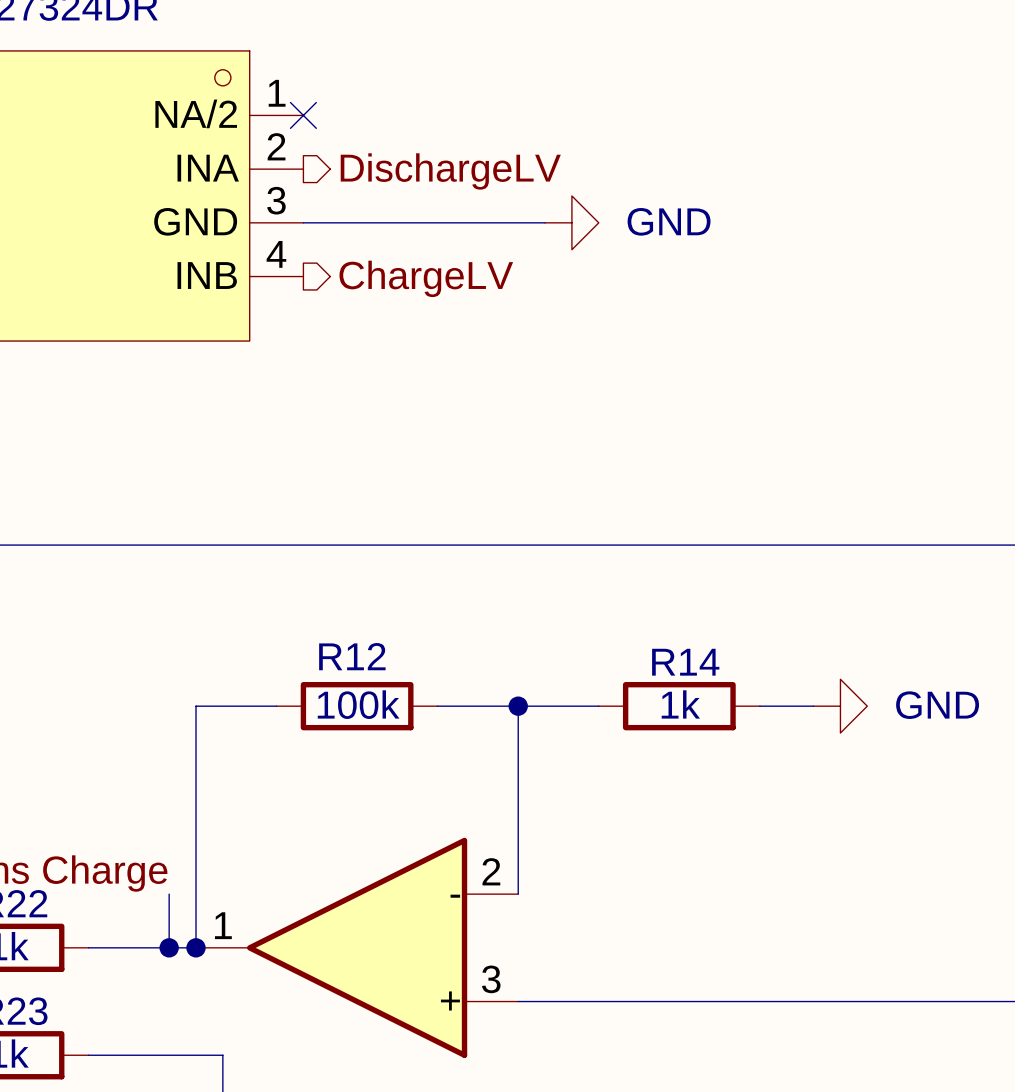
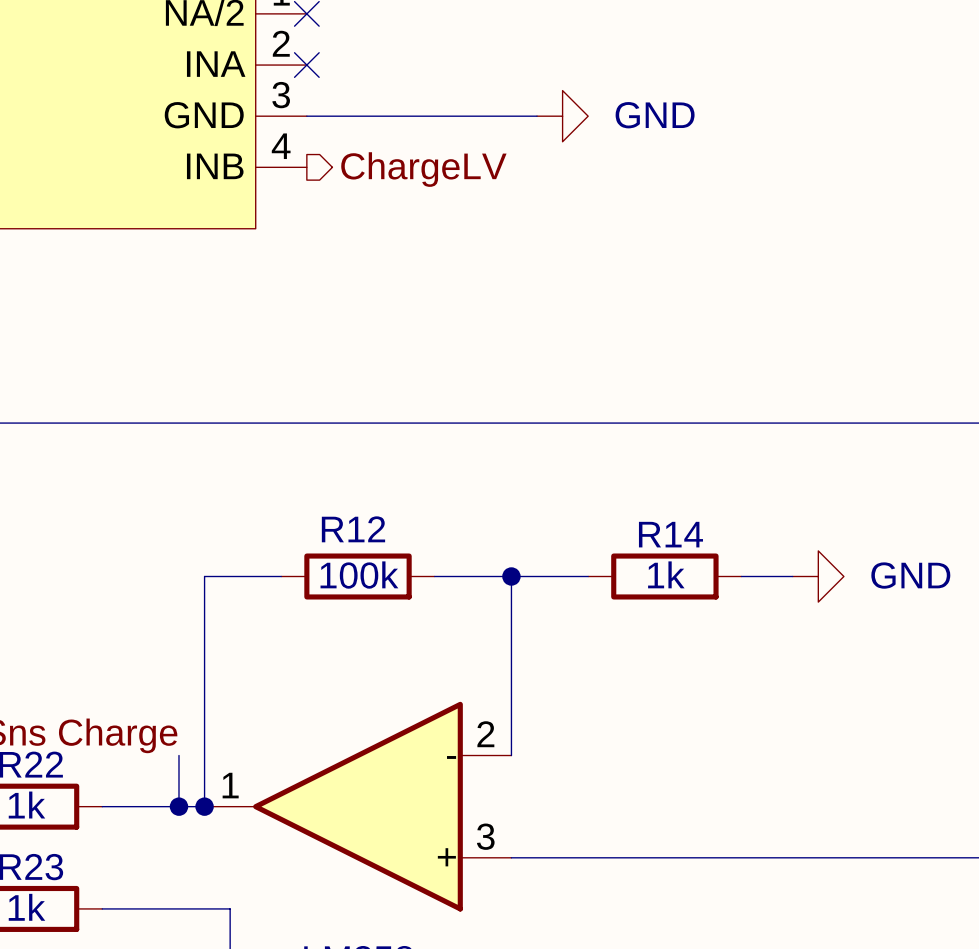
no-connect mark: none -> (306, 65)
hierarchical label: DischargeLV (450, 171) -> none

